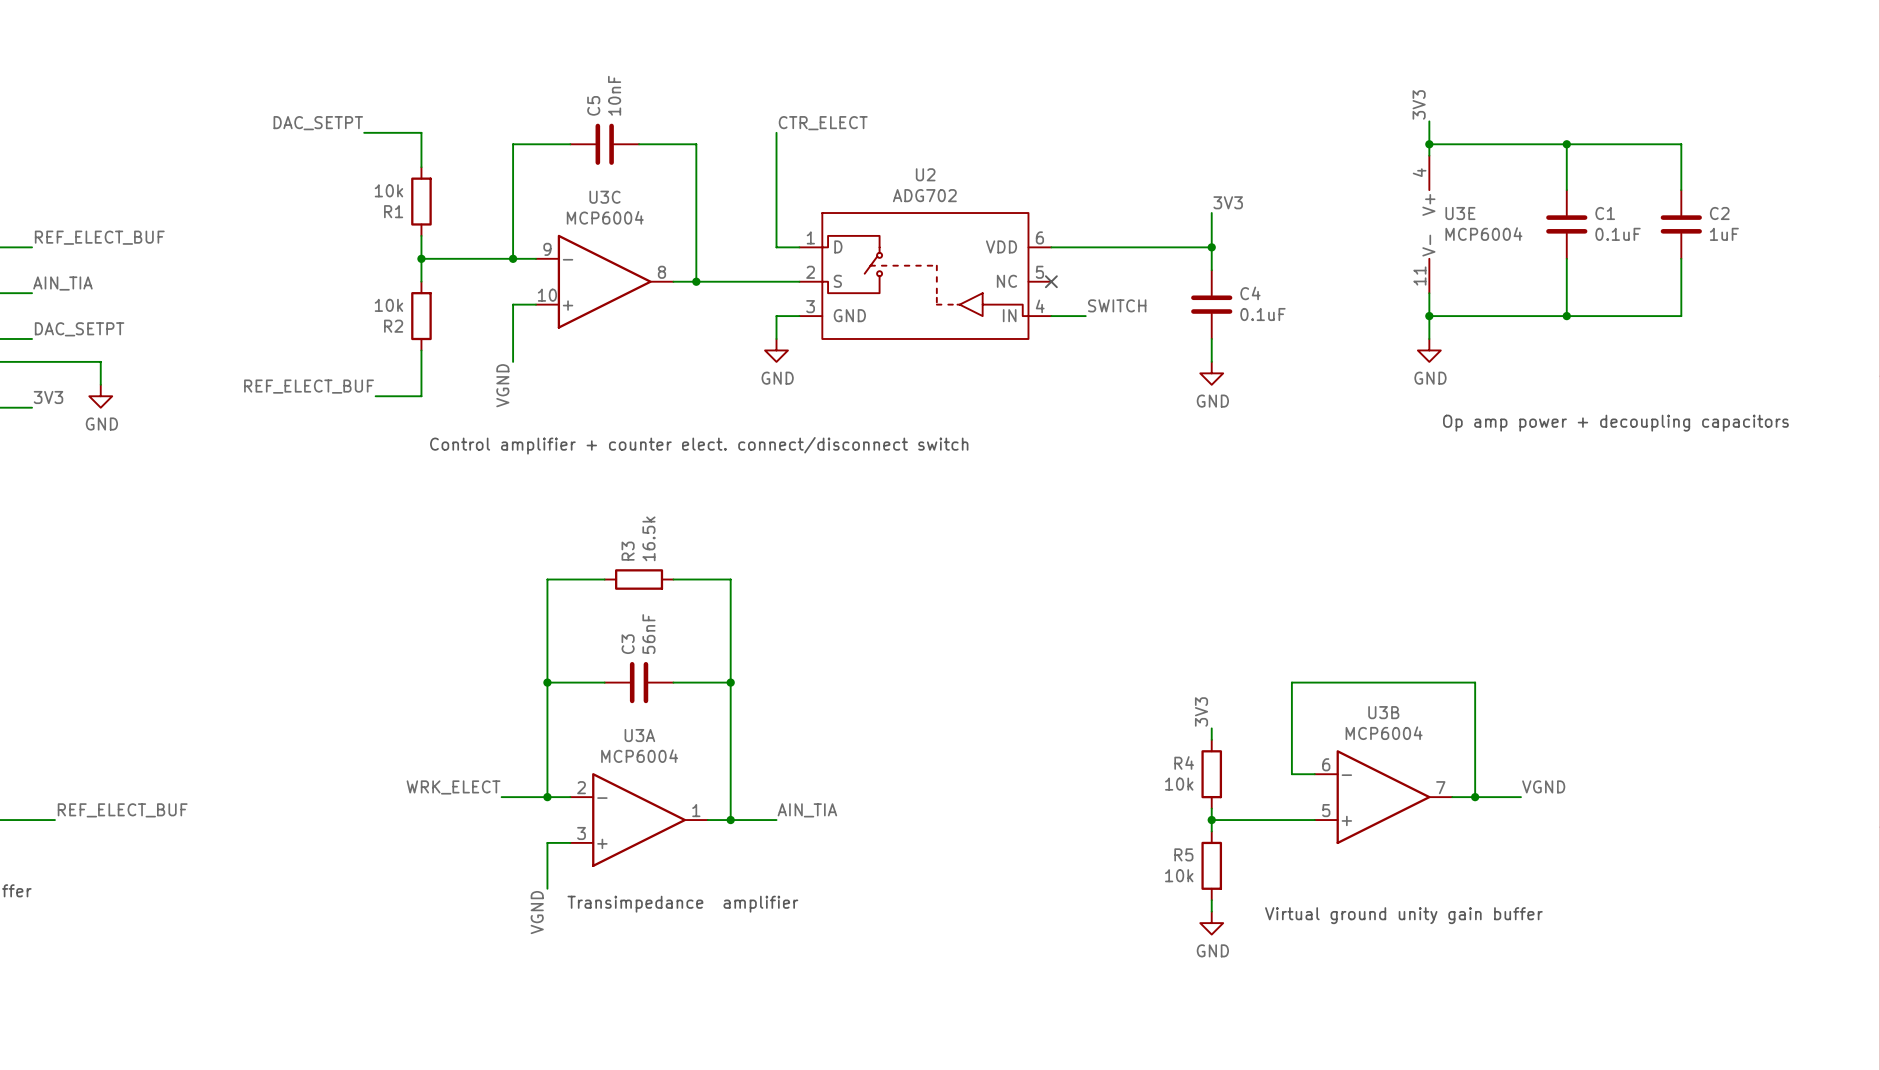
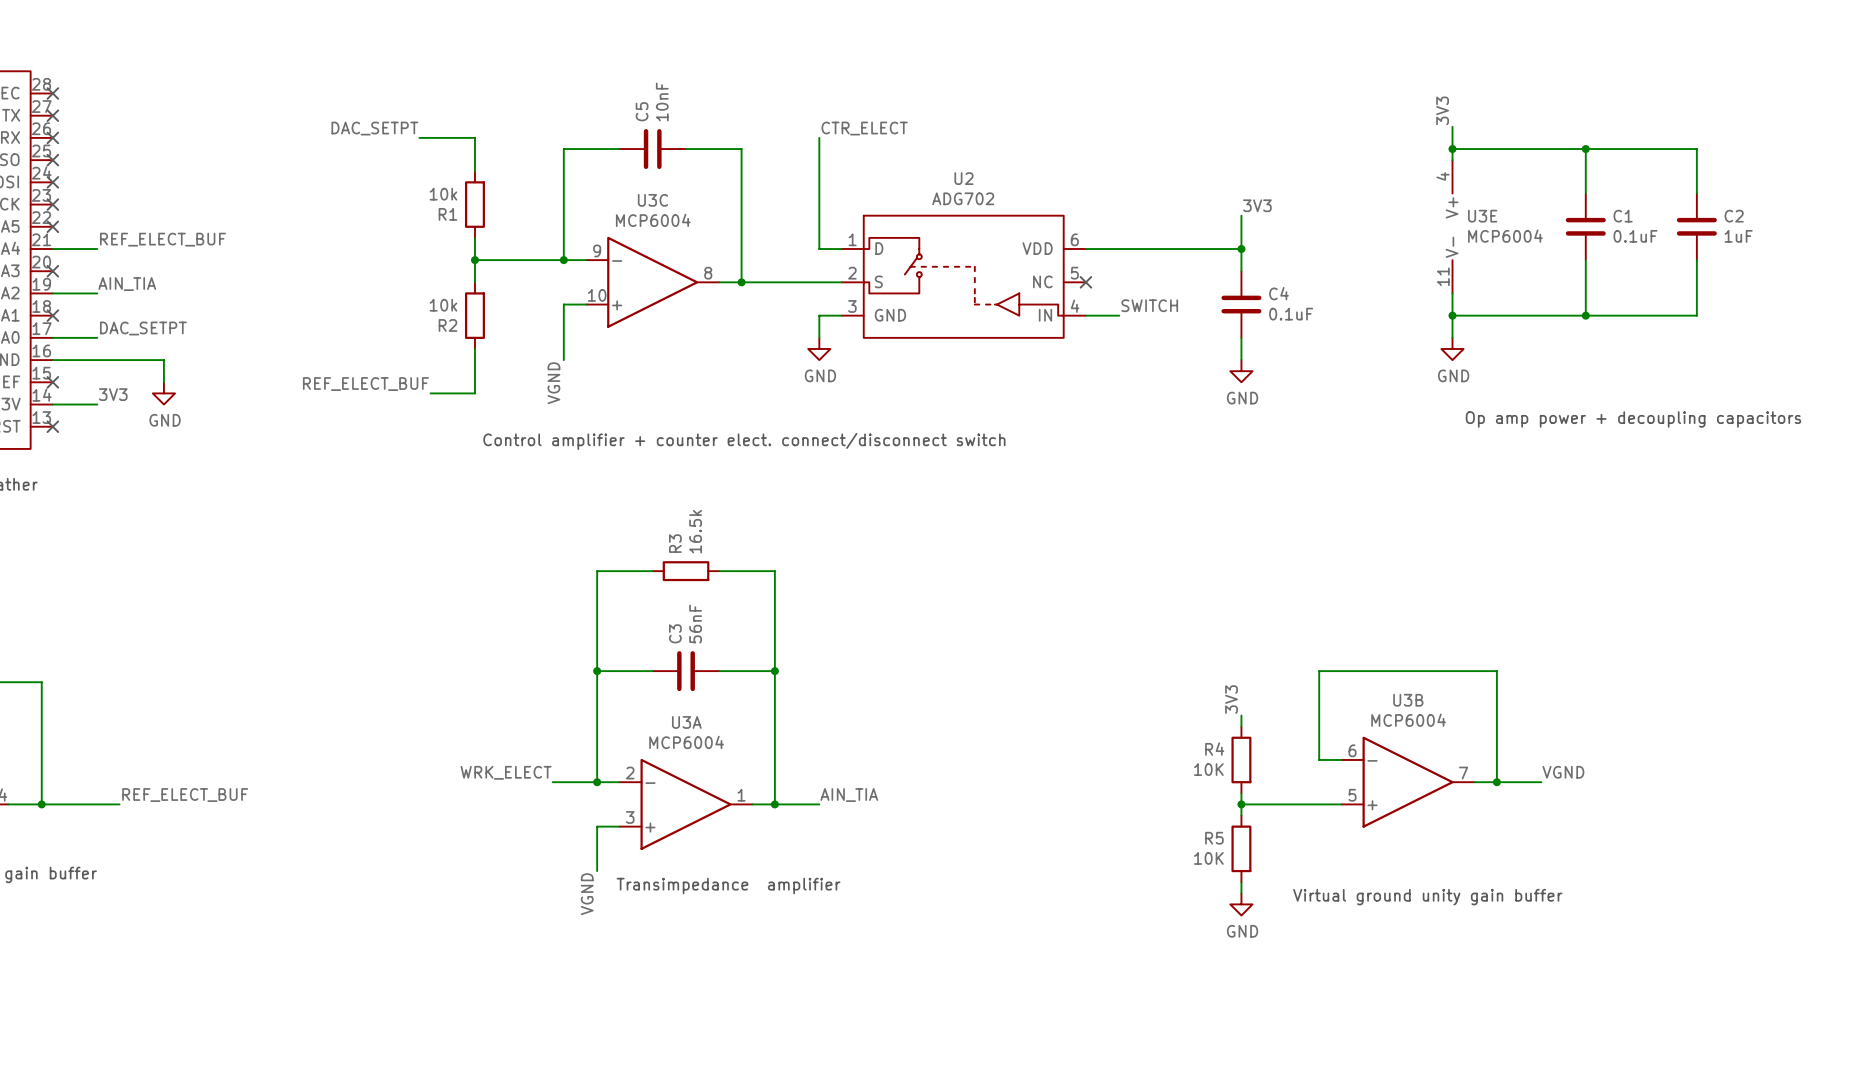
R4 value: 10k (1179, 784) -> 10K (1208, 769)
R5 value: 10k (1179, 875) -> 10K (1208, 858)

